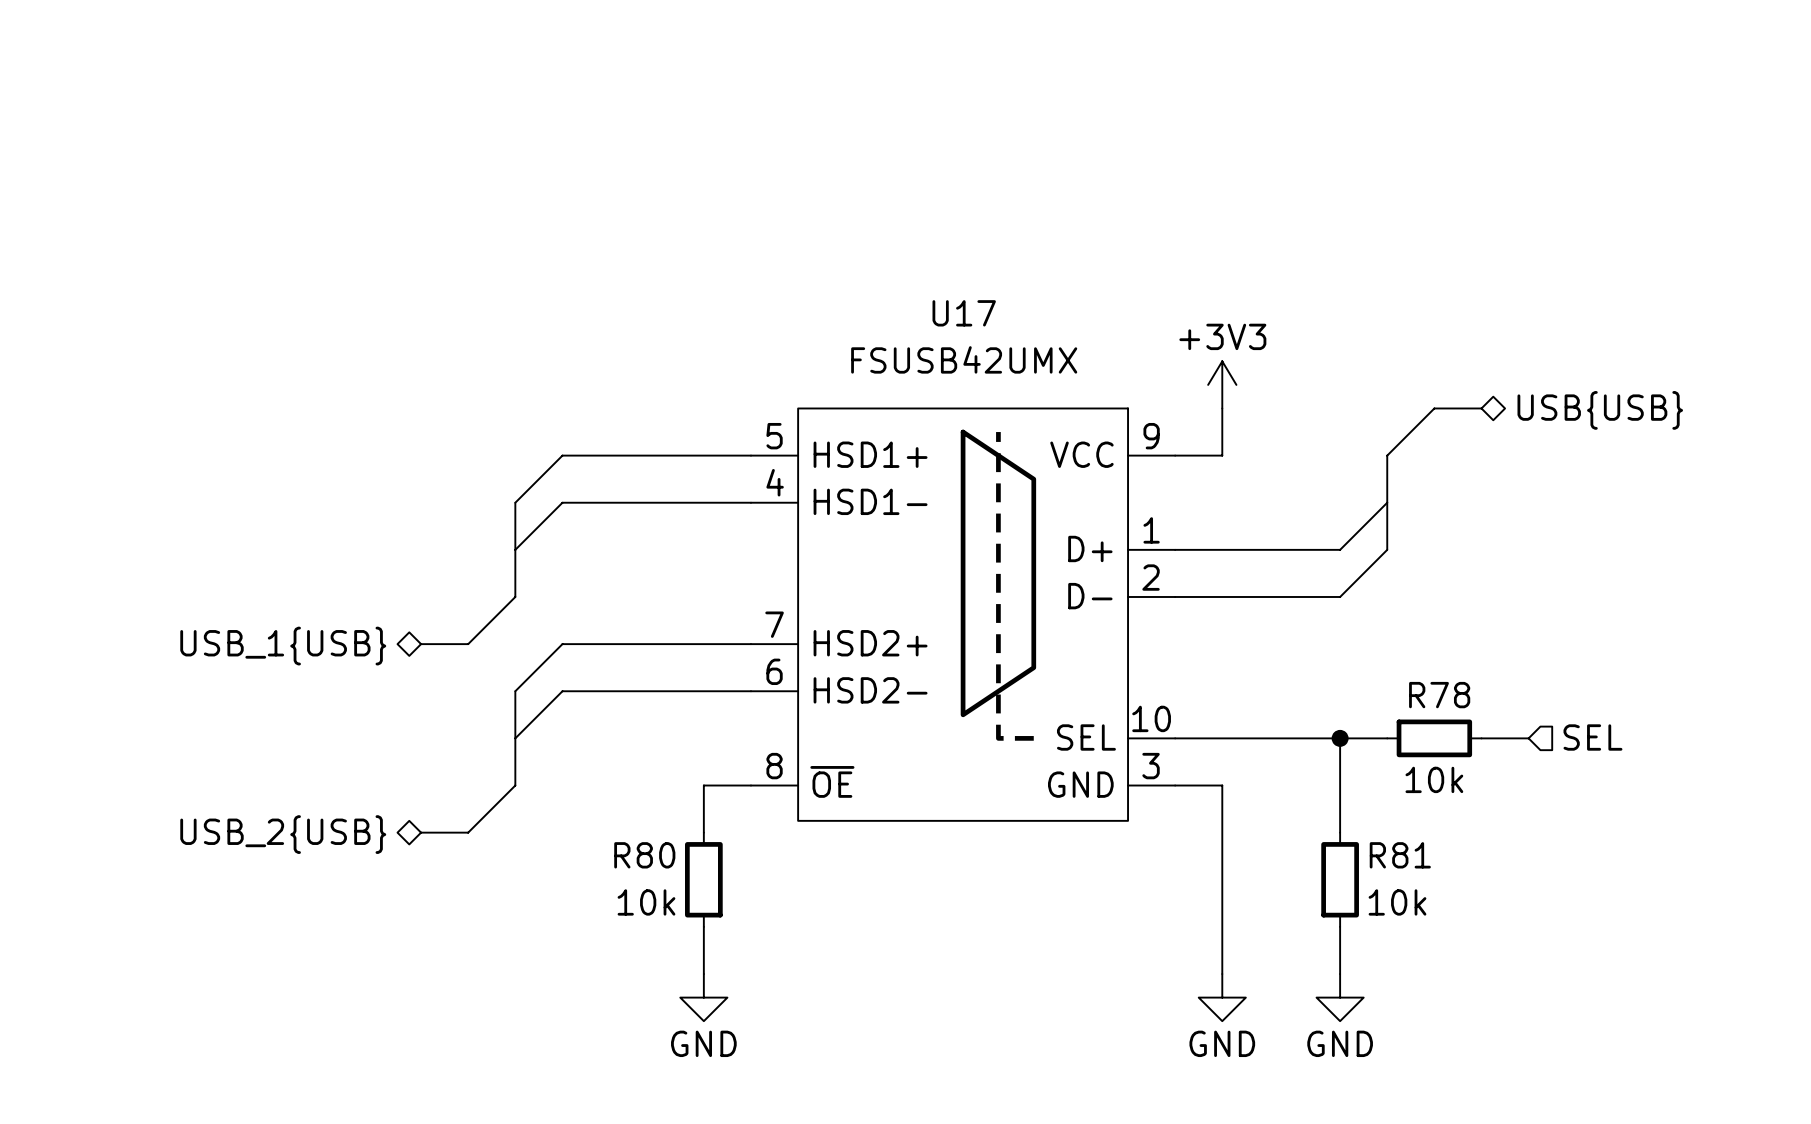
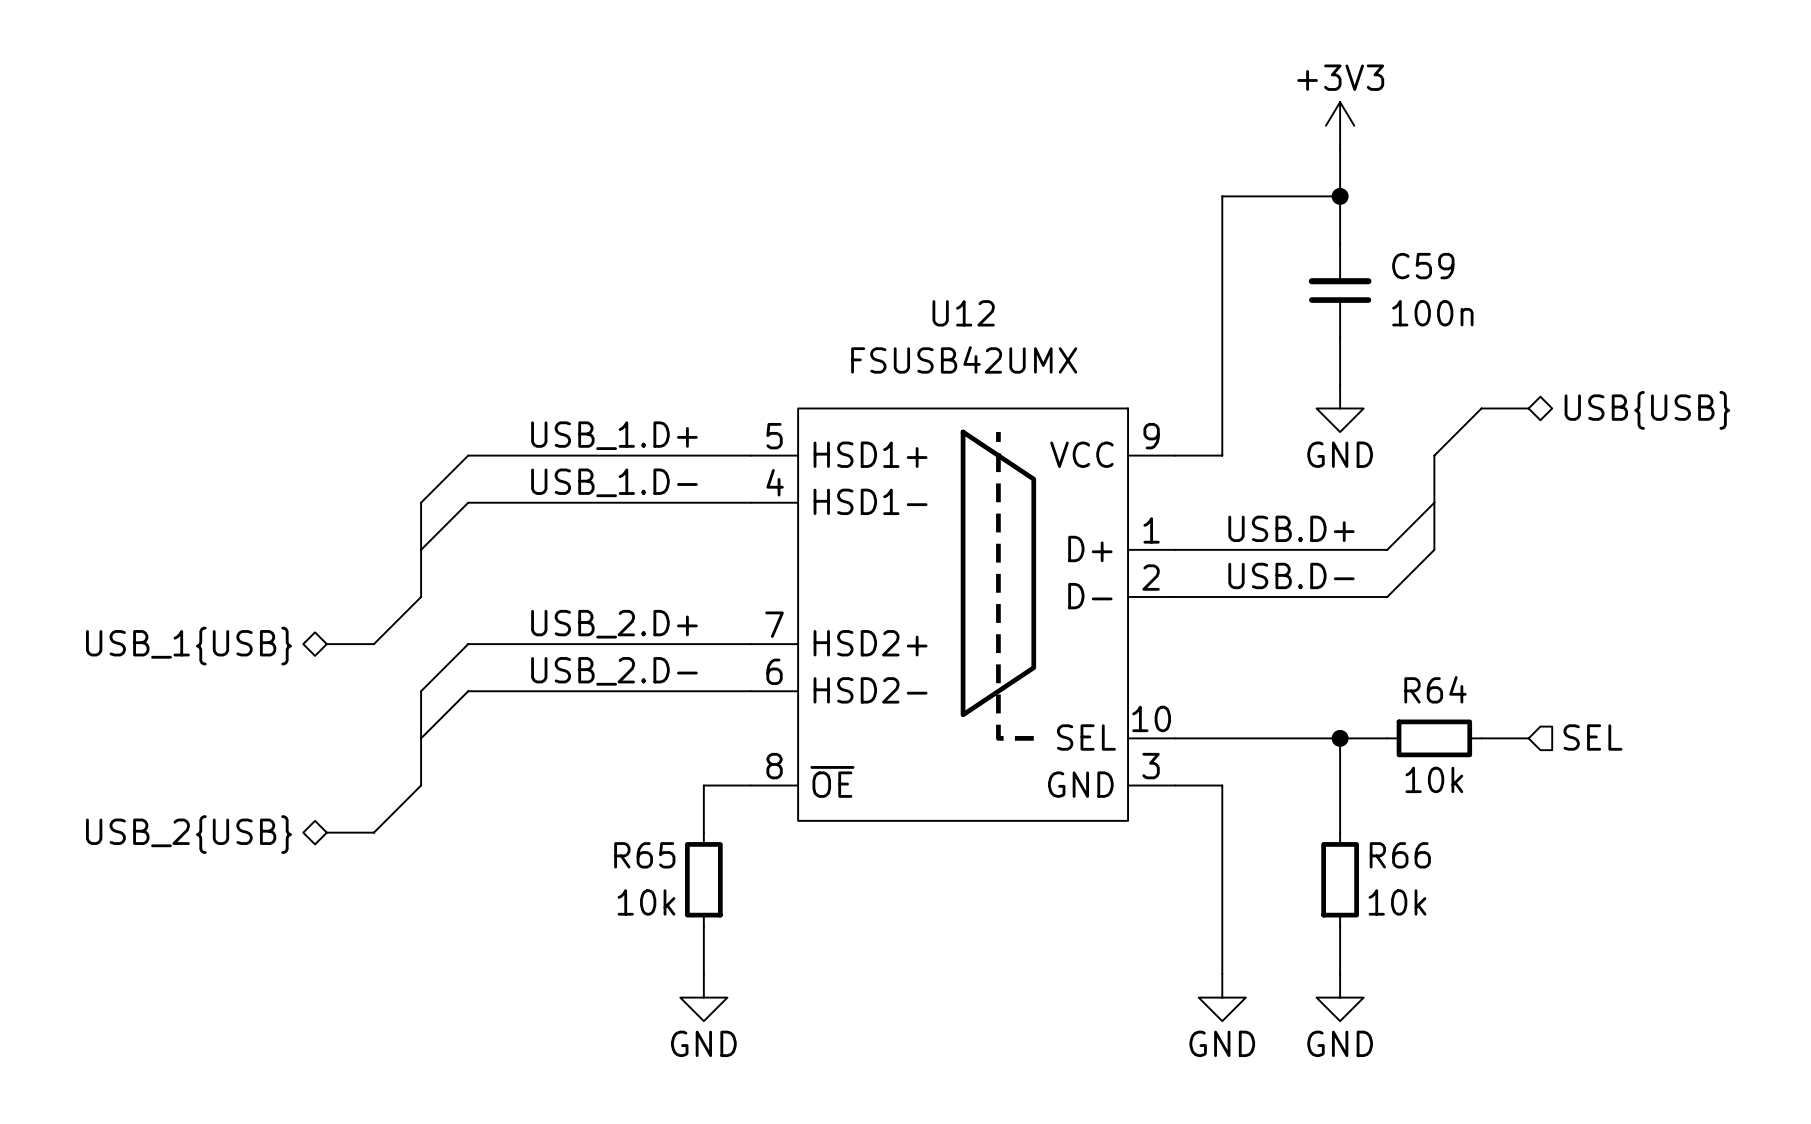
wire: none -> (1340, 149) (1340, 243)
wire: none -> (1340, 196) (1222, 196) (1222, 408)
junction: none -> (1340, 196)
C59: none -> (1340, 290)
U17 name: U17 (964, 313) -> U12 (963, 313)
wire: none -> (1340, 337) (1340, 384)
power symbol position: +3V3 (1222, 384) -> +3V3 (1340, 125)
power symbol: none -> GND (1340, 408)
bus: (1481, 408) (1434, 408) (1387, 455) (1387, 549) -> (1528, 408) (1481, 408) (1434, 455) (1434, 549)
hierarchical label position: USB{USB} (1600, 410) -> USB{USB} (1647, 410)
label: none -> USB_1.D+ (614, 435)
wire: (562, 455) (515, 502) -> (562, 455) (468, 455) (421, 502)
label: none -> USB_1.D- (614, 482)
bus: (515, 502) (515, 596) (468, 644) (421, 644) -> (421, 502) (421, 596) (373, 644) (326, 644)
wire: (562, 502) (515, 549) -> (562, 502) (468, 502) (421, 549)
wire: (1387, 502) (1340, 549) -> (1434, 502) (1387, 549) (1340, 549)
label: none -> USB.D+ (1291, 528)
wire: (1387, 549) (1340, 596) -> (1434, 549) (1387, 596) (1340, 596)
label: none -> USB.D- (1291, 575)
label: none -> USB_2.D+ (614, 624)
wire: (562, 644) (515, 691) -> (562, 644) (468, 644) (421, 691)
hierarchical label position: USB_1{USB} (283, 646) -> USB_1{USB} (188, 646)
label: none -> USB_2.D- (614, 671)
bus: (515, 691) (515, 785) (468, 832) (421, 832) -> (421, 691) (421, 785) (373, 832) (326, 832)
wire: (562, 691) (515, 738) -> (562, 691) (468, 691) (421, 738)
R78 name: R78 (1439, 695) -> R64 (1435, 689)
hierarchical label position: USB_2{USB} (283, 834) -> USB_2{USB} (188, 834)
R80 name: R80 (644, 855) -> R65 (644, 855)
R81 name: R81 (1400, 855) -> R66 (1400, 855)

